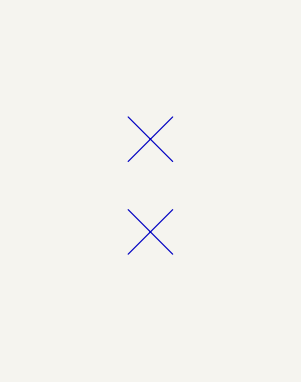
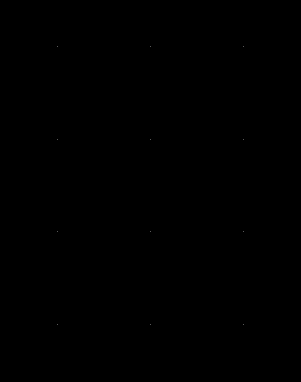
no-connect mark: (150, 139) -> none
no-connect mark: (150, 231) -> none

